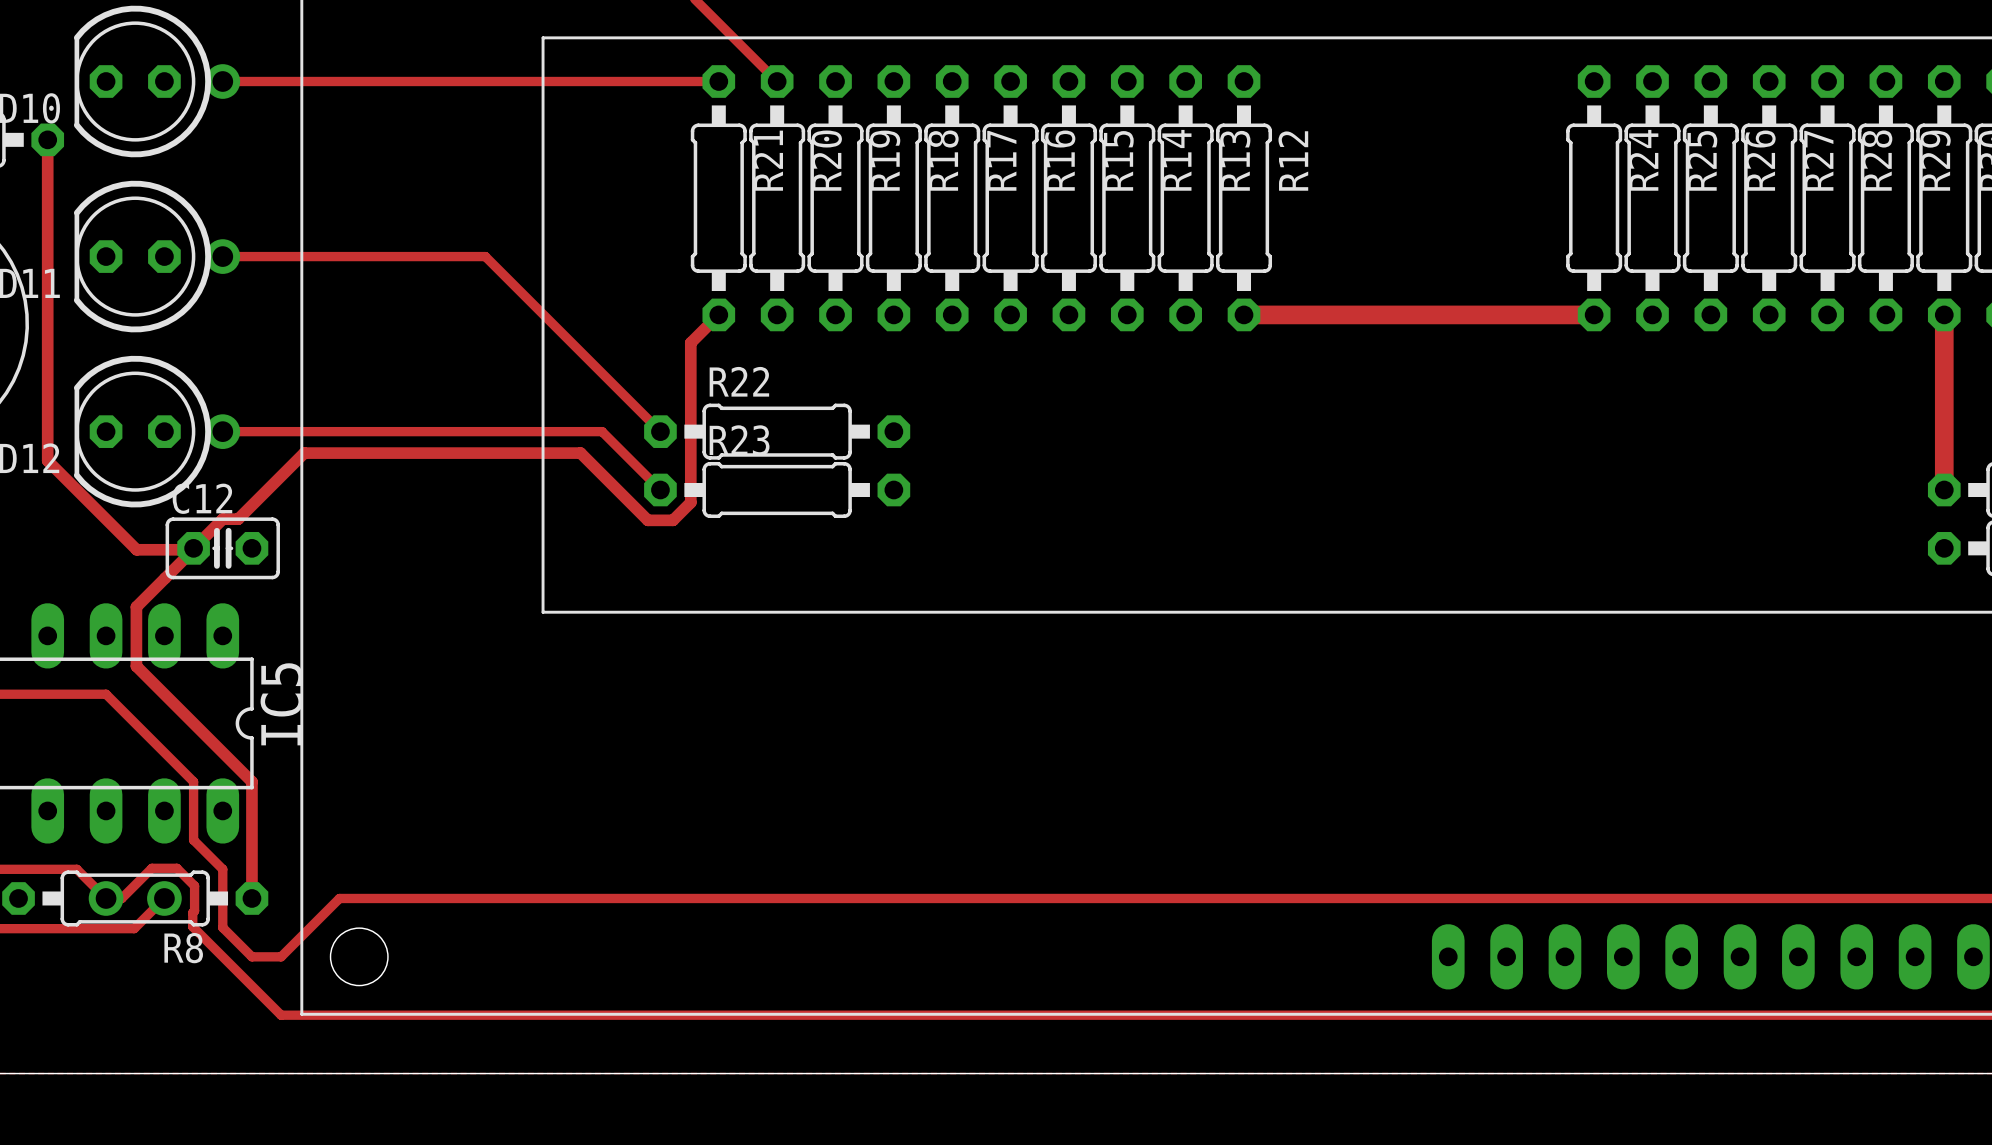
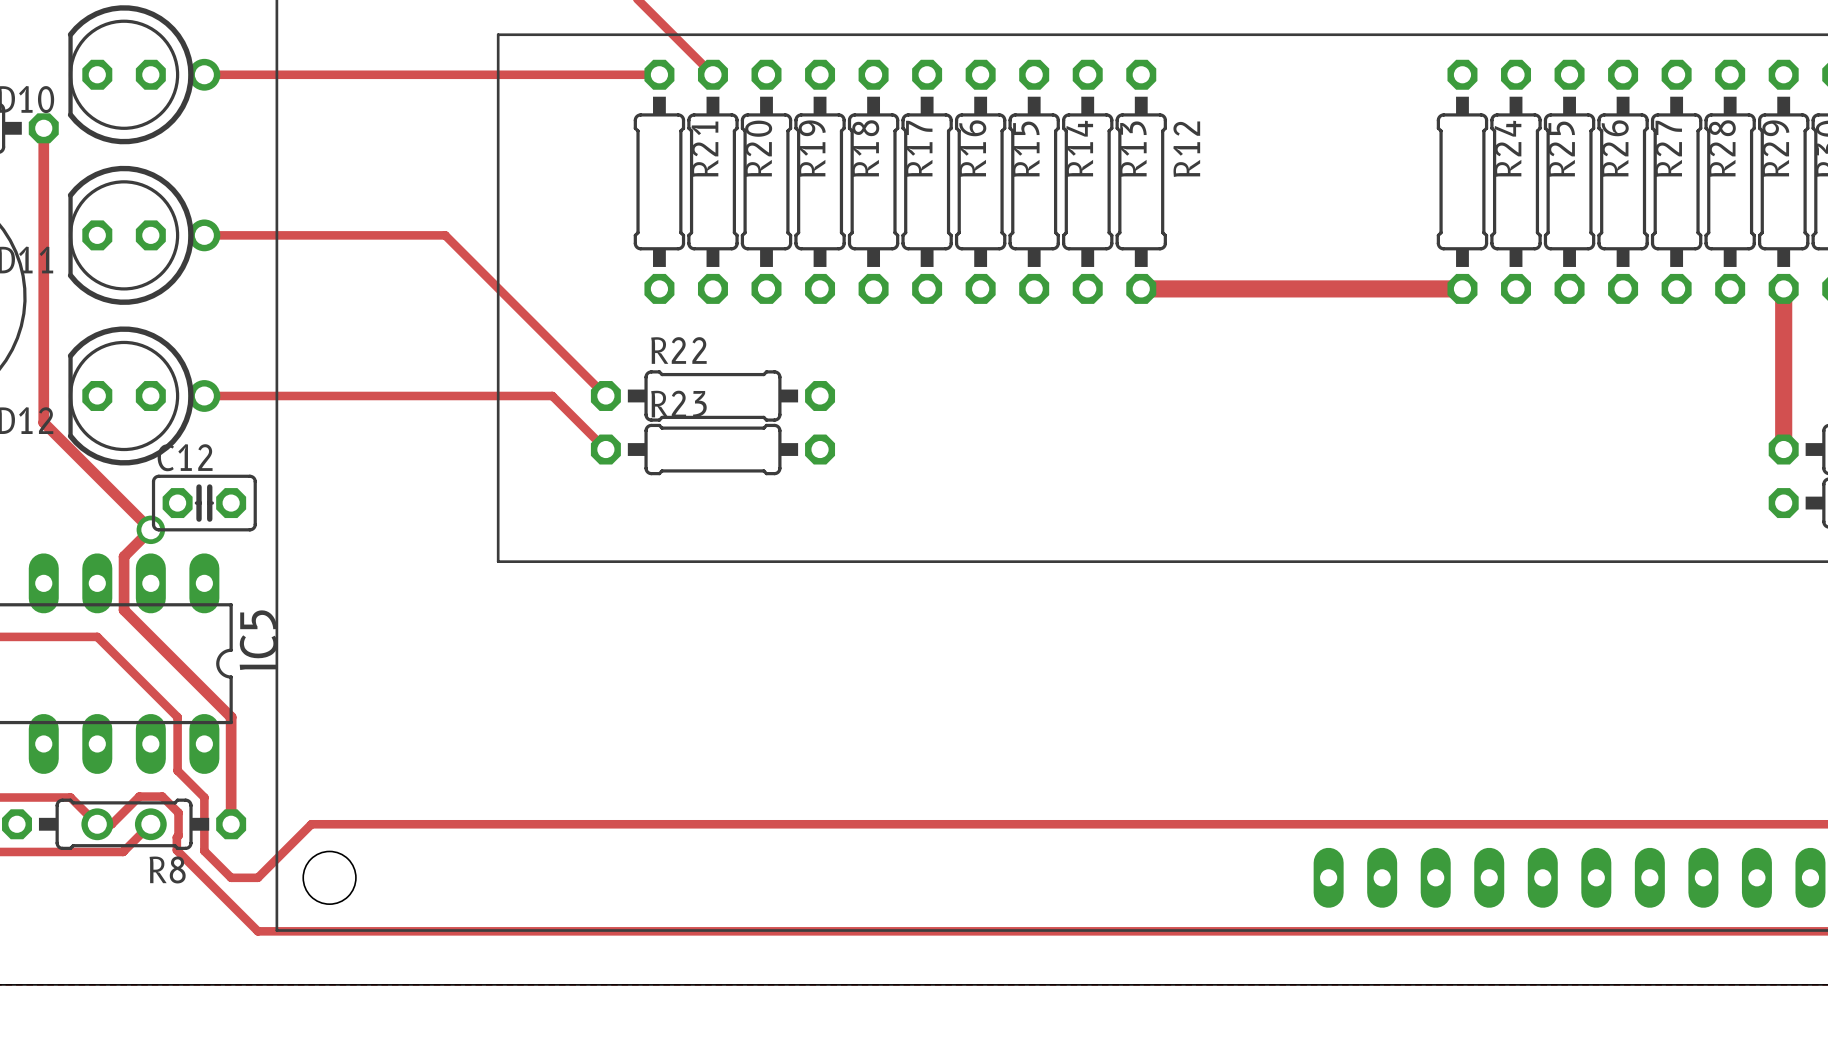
track: (718, 314) (690, 342) (690, 502) (673, 520) (647, 520) (580, 453) (304, 453) (238, 519) (222, 519) (193, 549) -> none
track: (136, 549) (193, 549) -> none
track: (193, 549) (136, 606) (136, 666) -> (125, 504) (150, 529) (124, 556) (125, 611)
via: none -> (150, 529)

